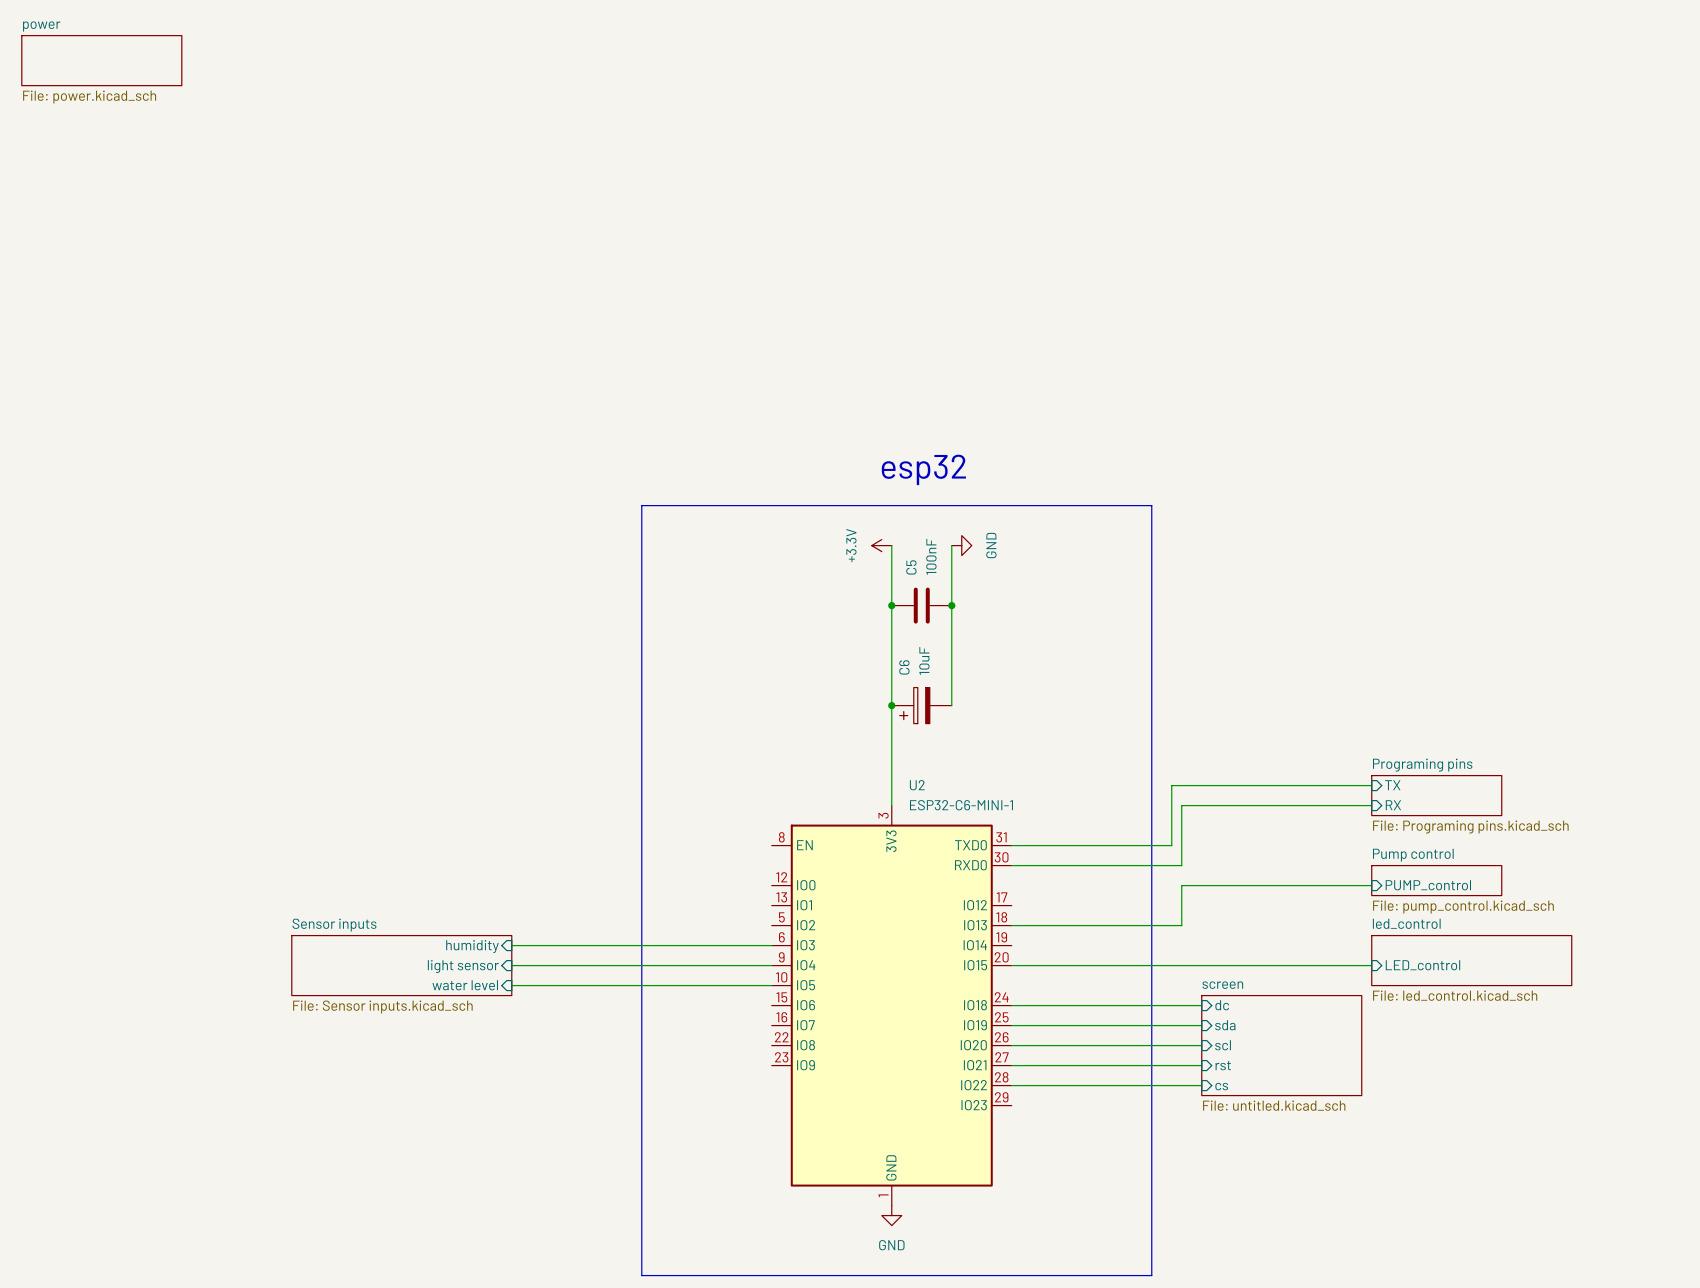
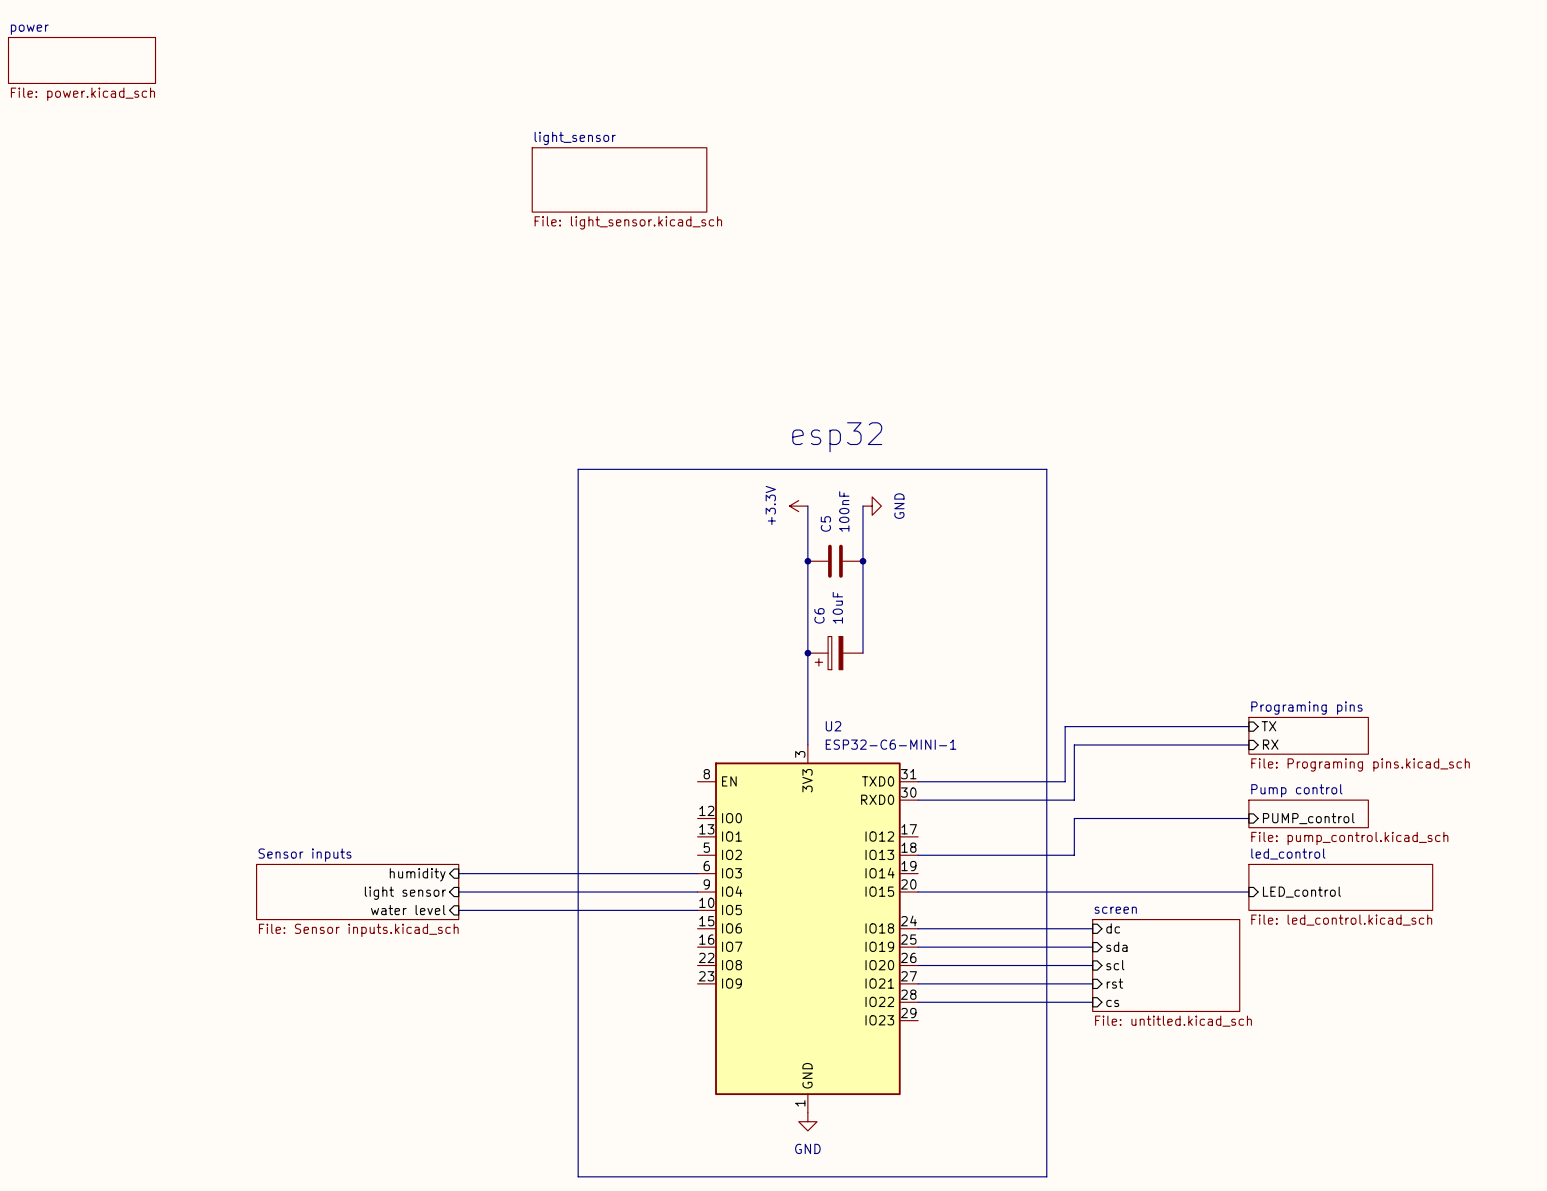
sheet light_sensor: none -> File: light_sensor.kicad_sch (619, 179)

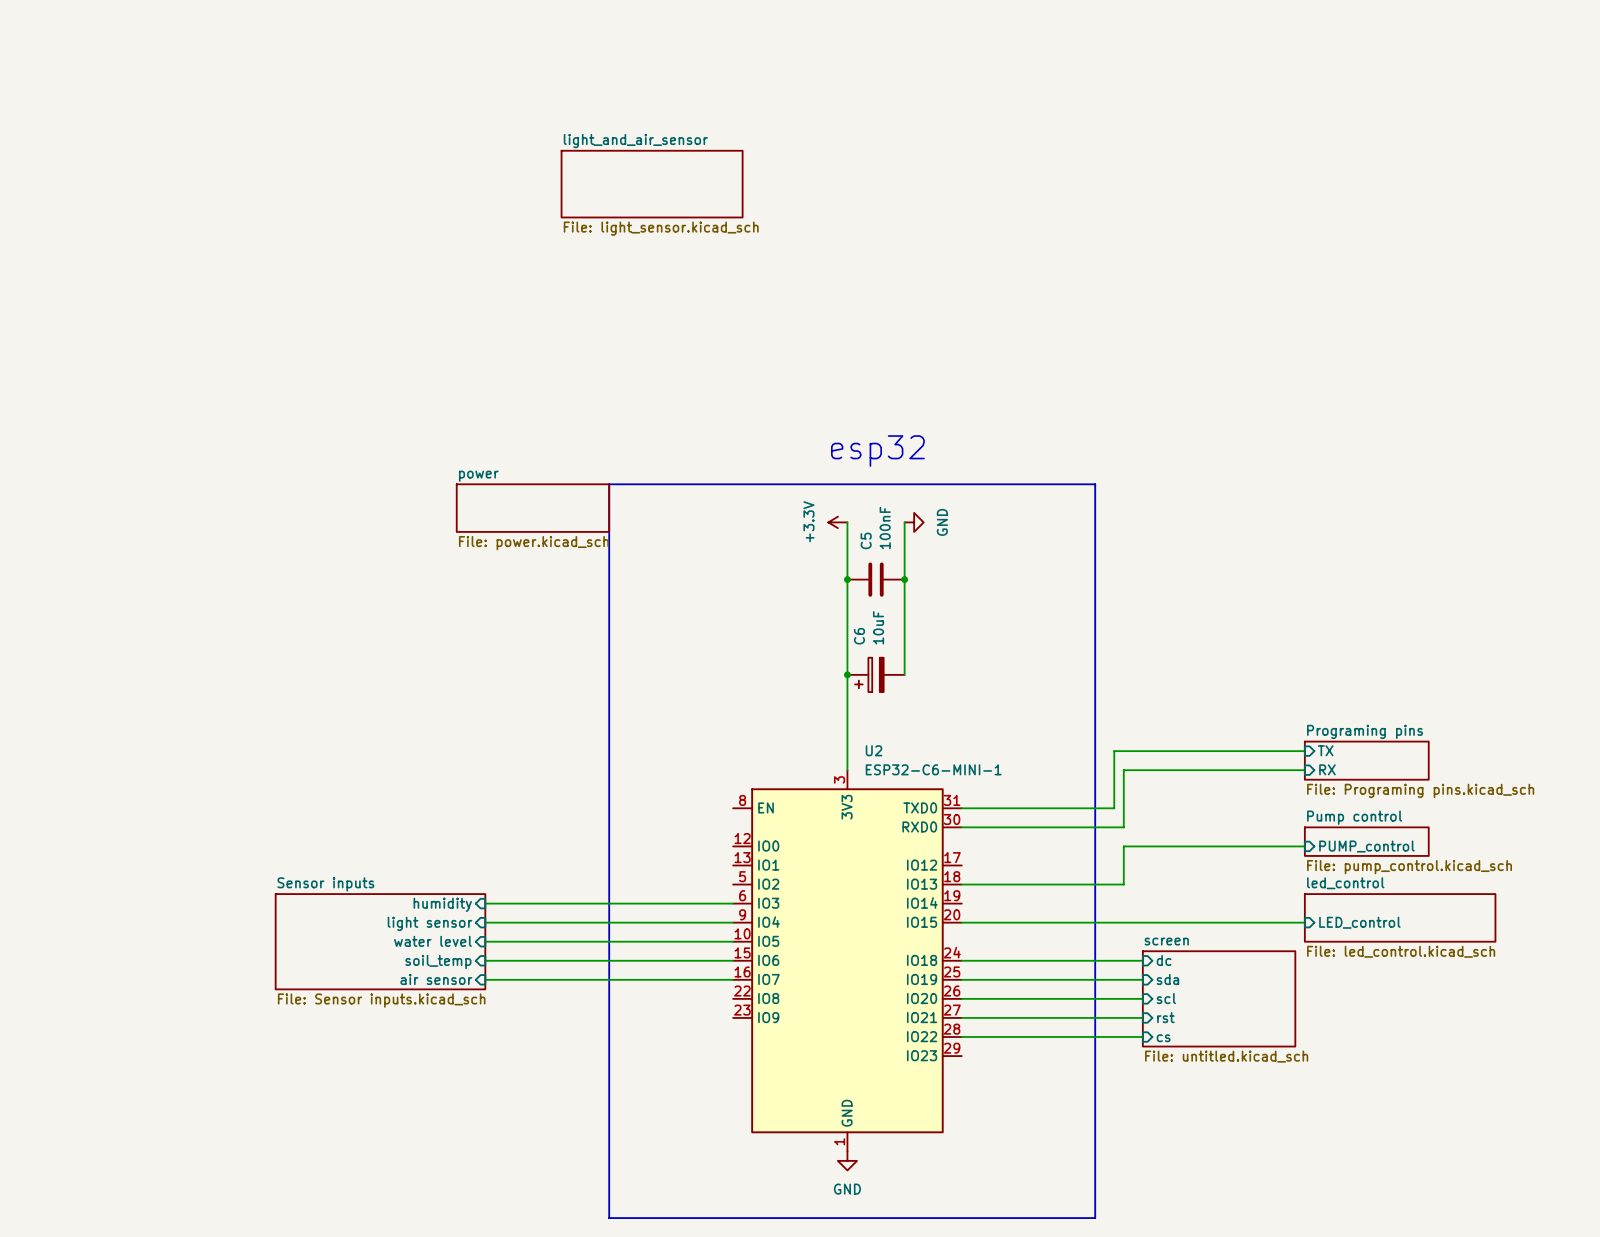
sheet power: File: power.kicad_sch (82, 60) -> none
sheet light_sensor name: light_sensor (575, 138) -> light_and_air_sensor (635, 141)
sheet power: none -> File: power.kicad_sch (532, 508)
sheet Sensor inputs: File: Sensor inputs.kicad_sch (357, 892) -> none
sheet Sensor inputs: none -> File: Sensor inputs.kicad_sch (380, 941)
wire: none -> (485, 960) (733, 960)
sheet pin: none -> soil_temp (438, 962)
sheet pin: none -> air sensor (436, 979)
wire: none -> (485, 979) (733, 979)

